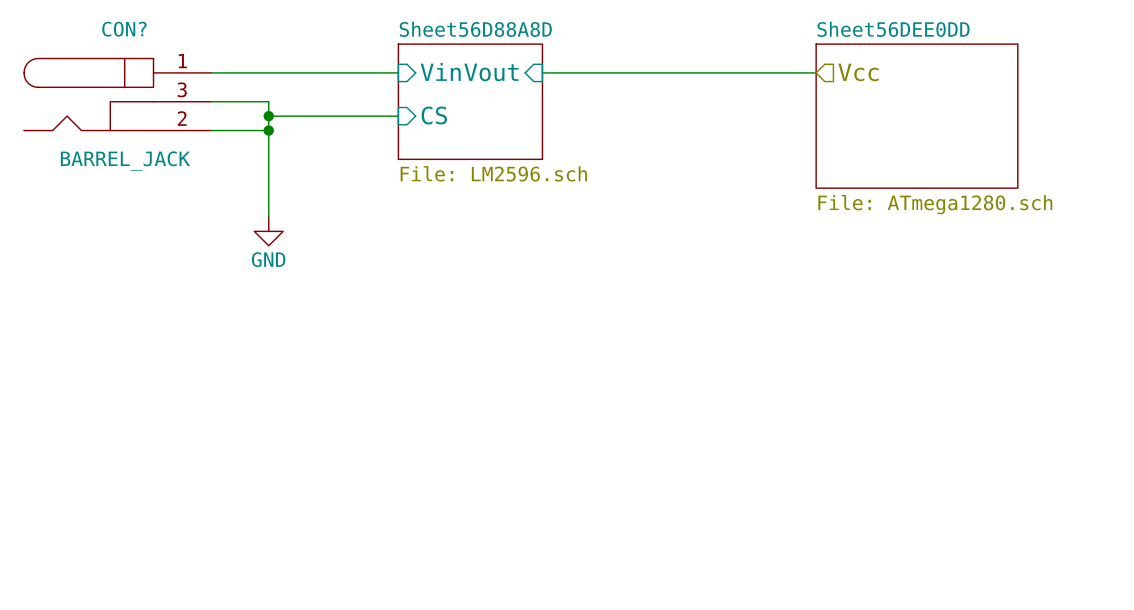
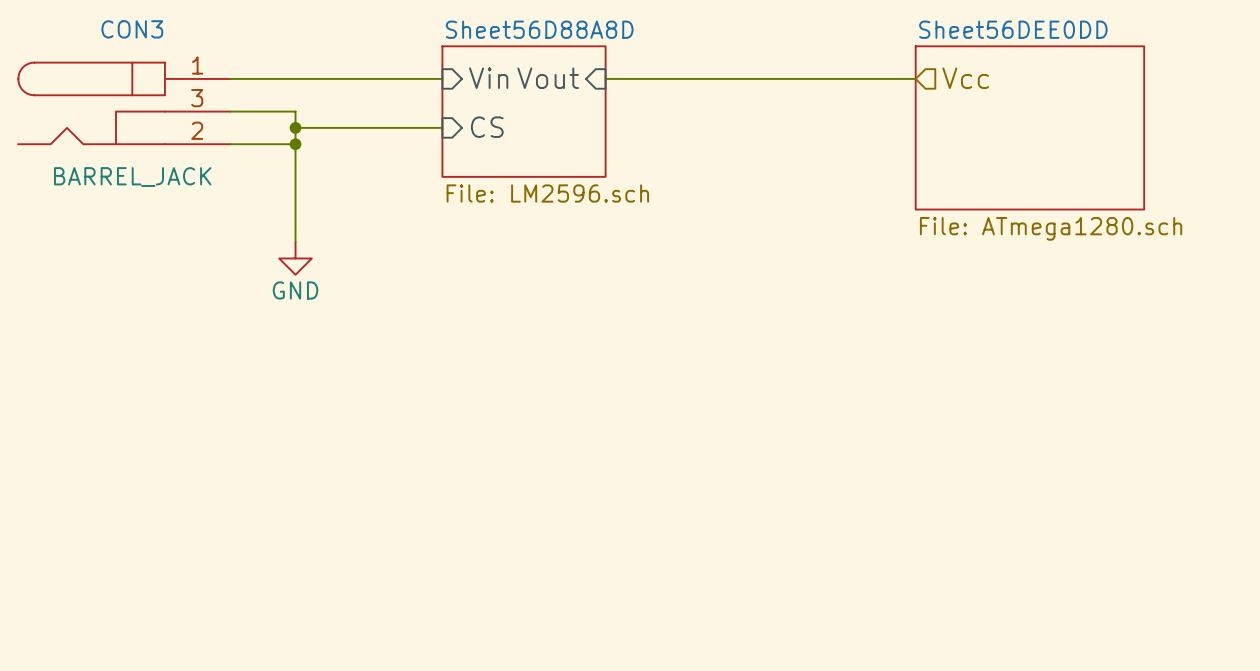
CON? name: CON? (124, 29) -> CON3 (132, 29)

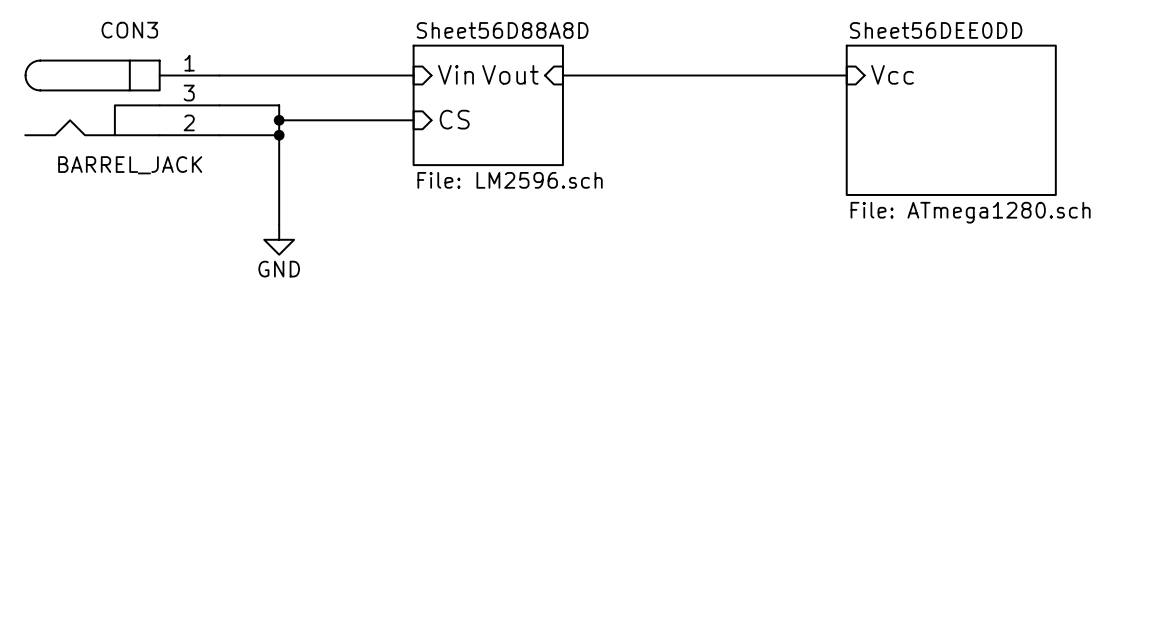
hierarchical label: Vcc (965, 78) -> none
sheet pin: none -> Vcc (892, 74)

